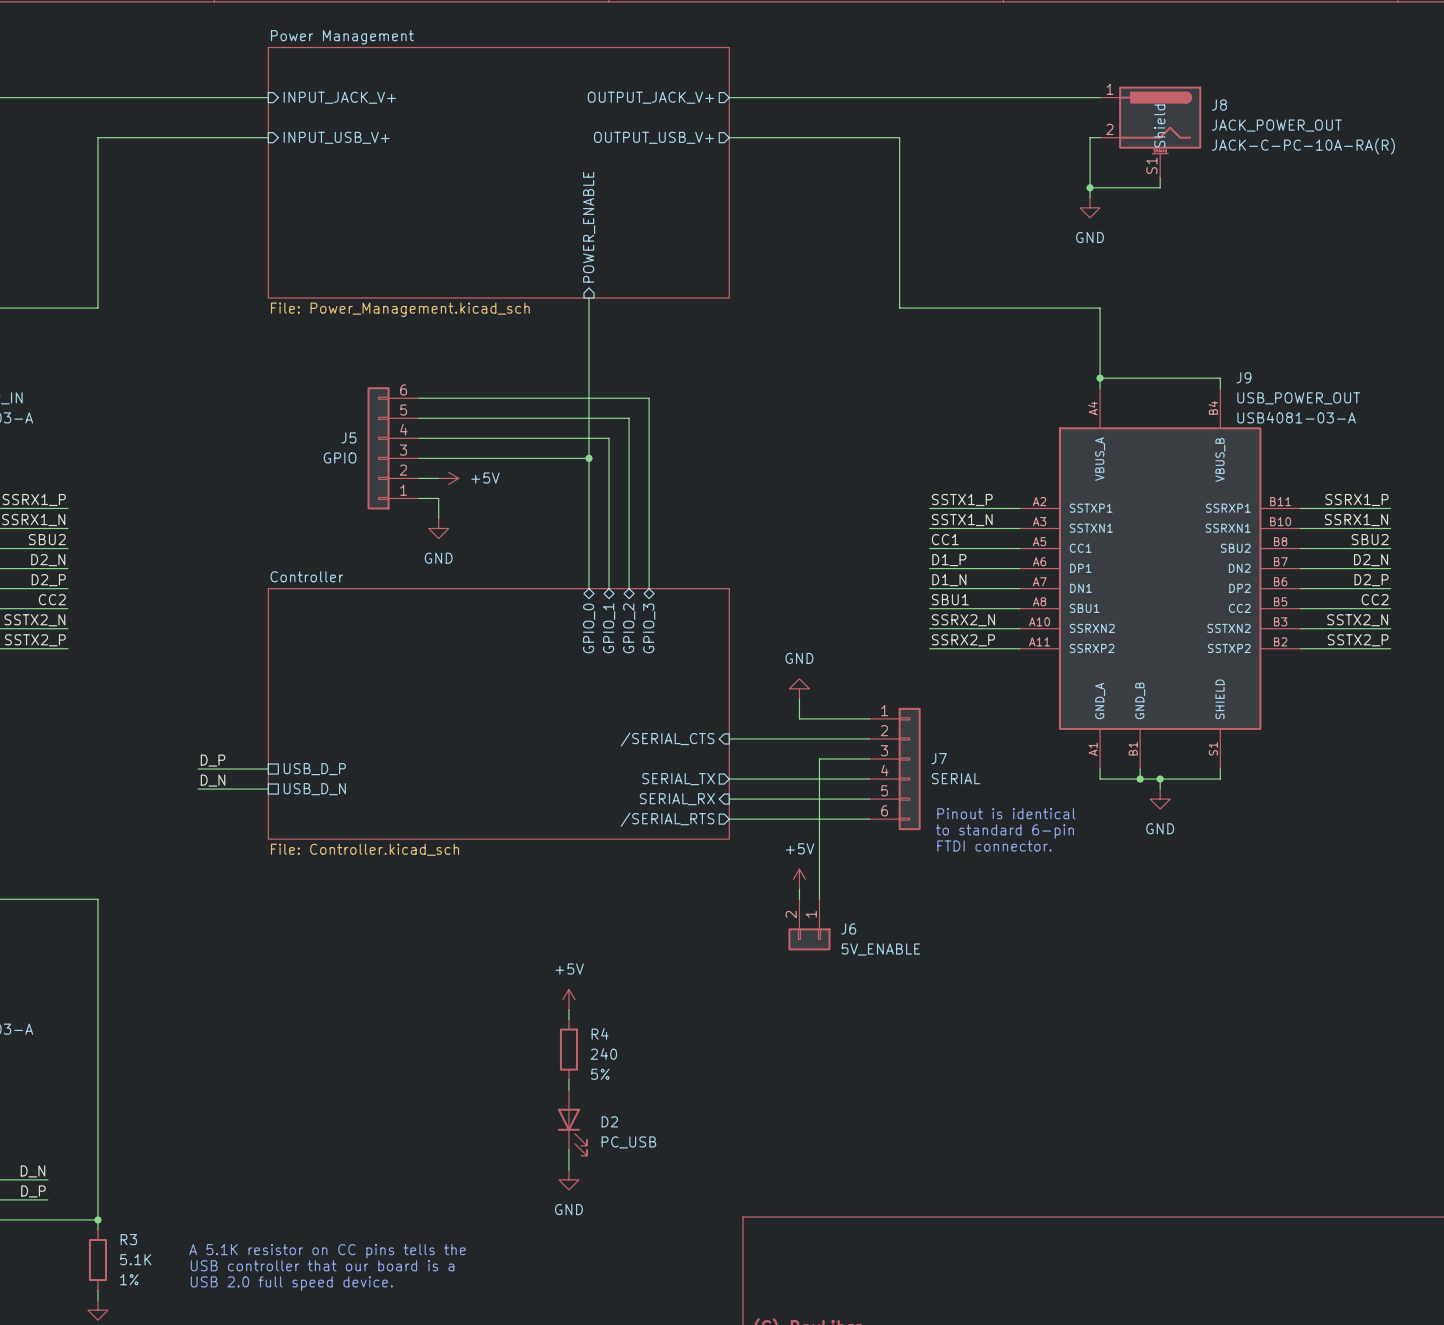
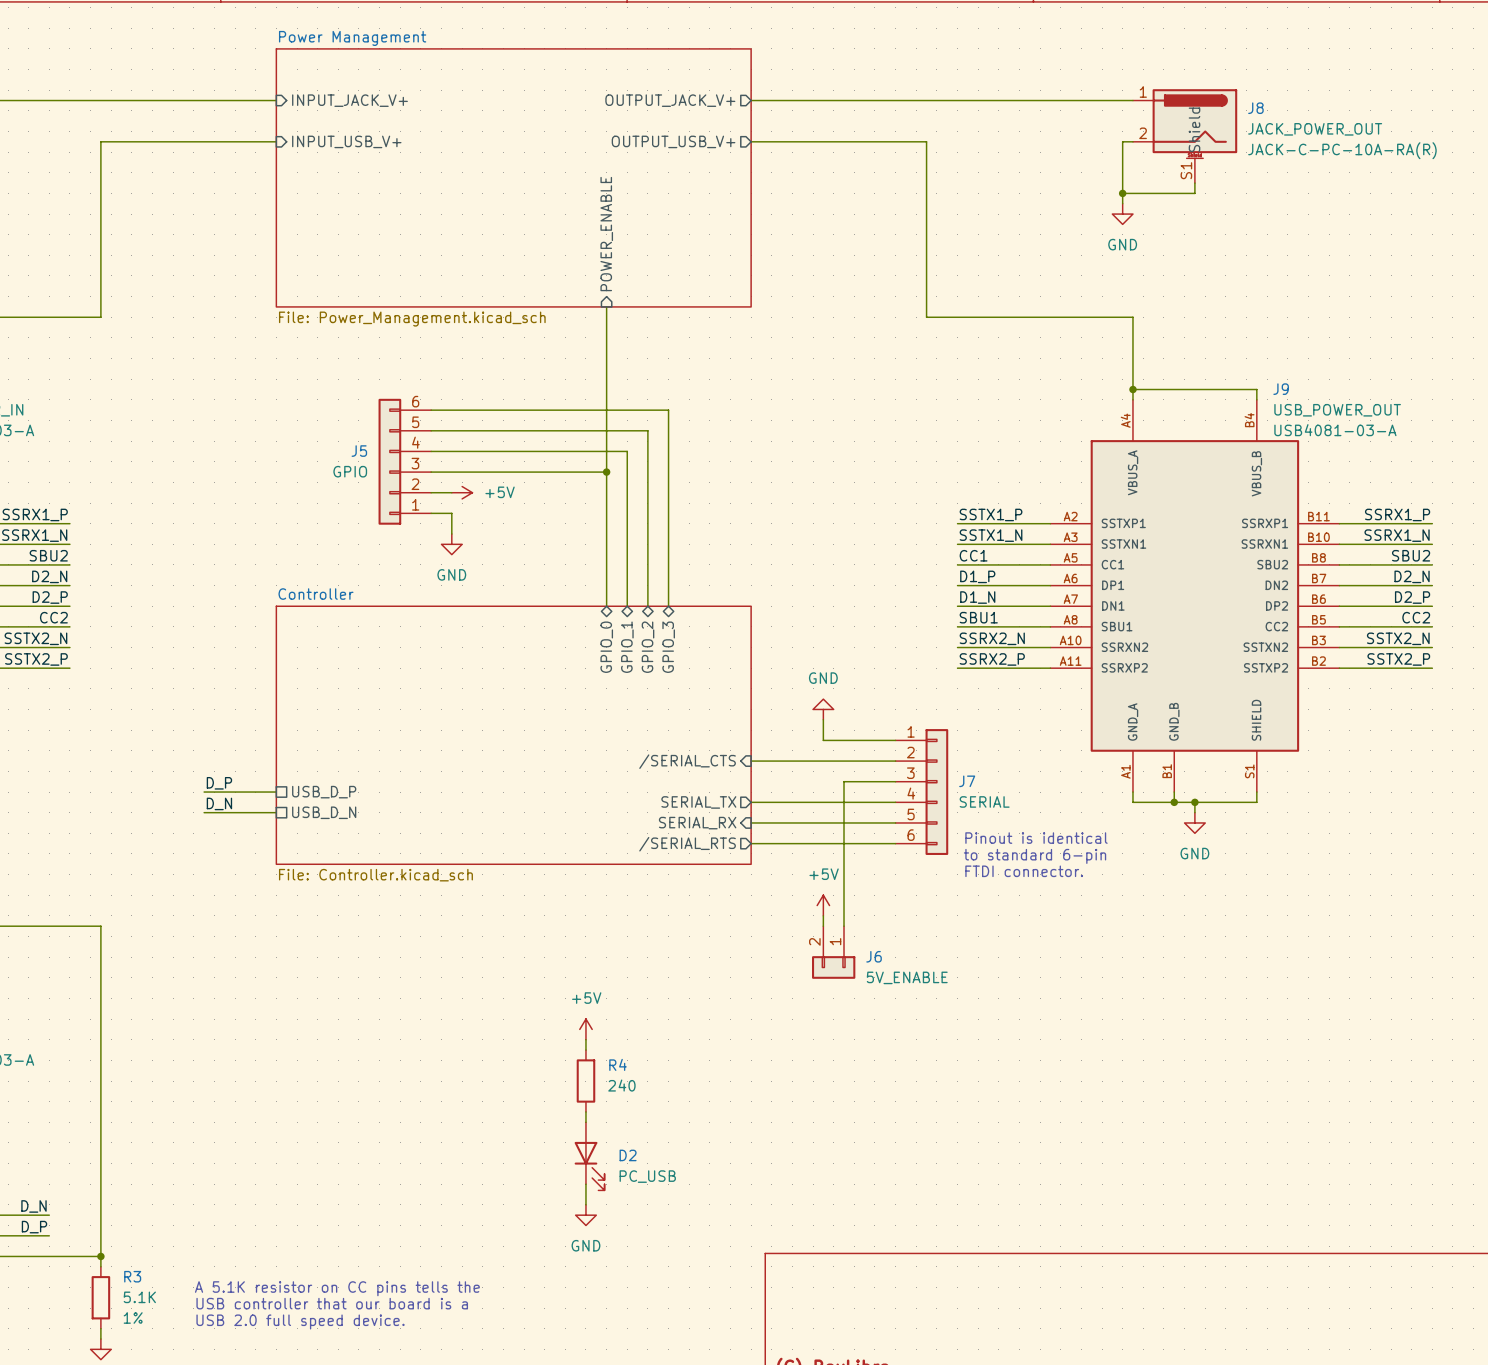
R4 text: 5% (600, 1074) -> none

